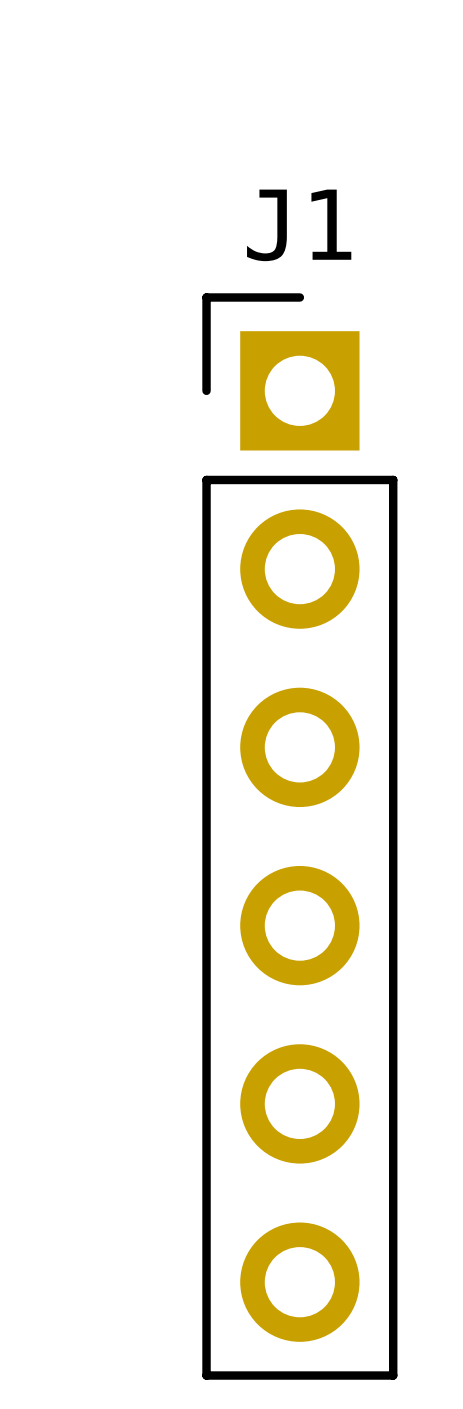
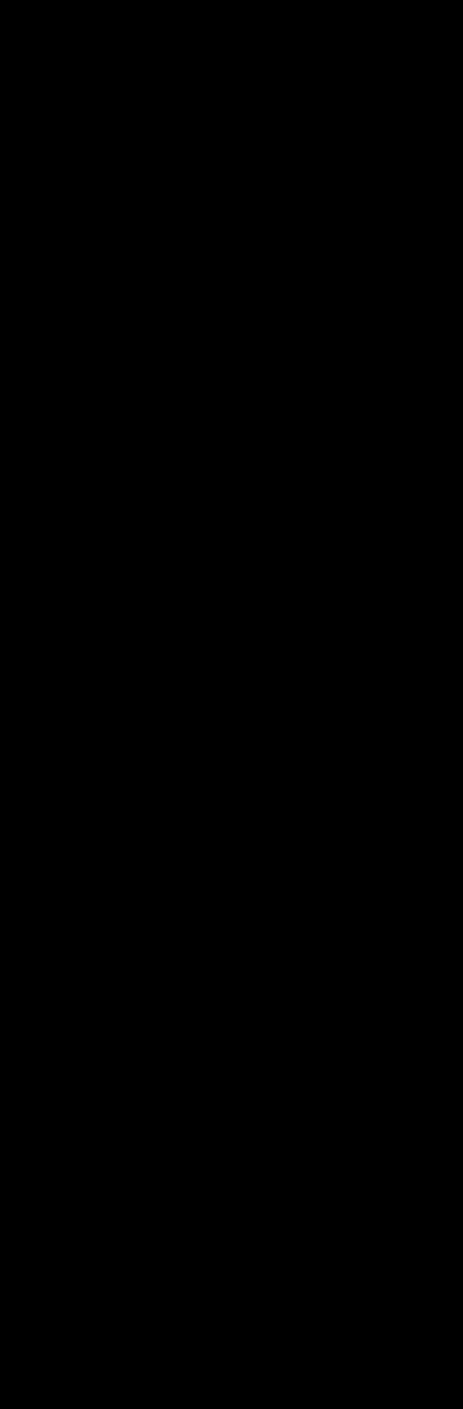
J1: (299, 836) -> none

